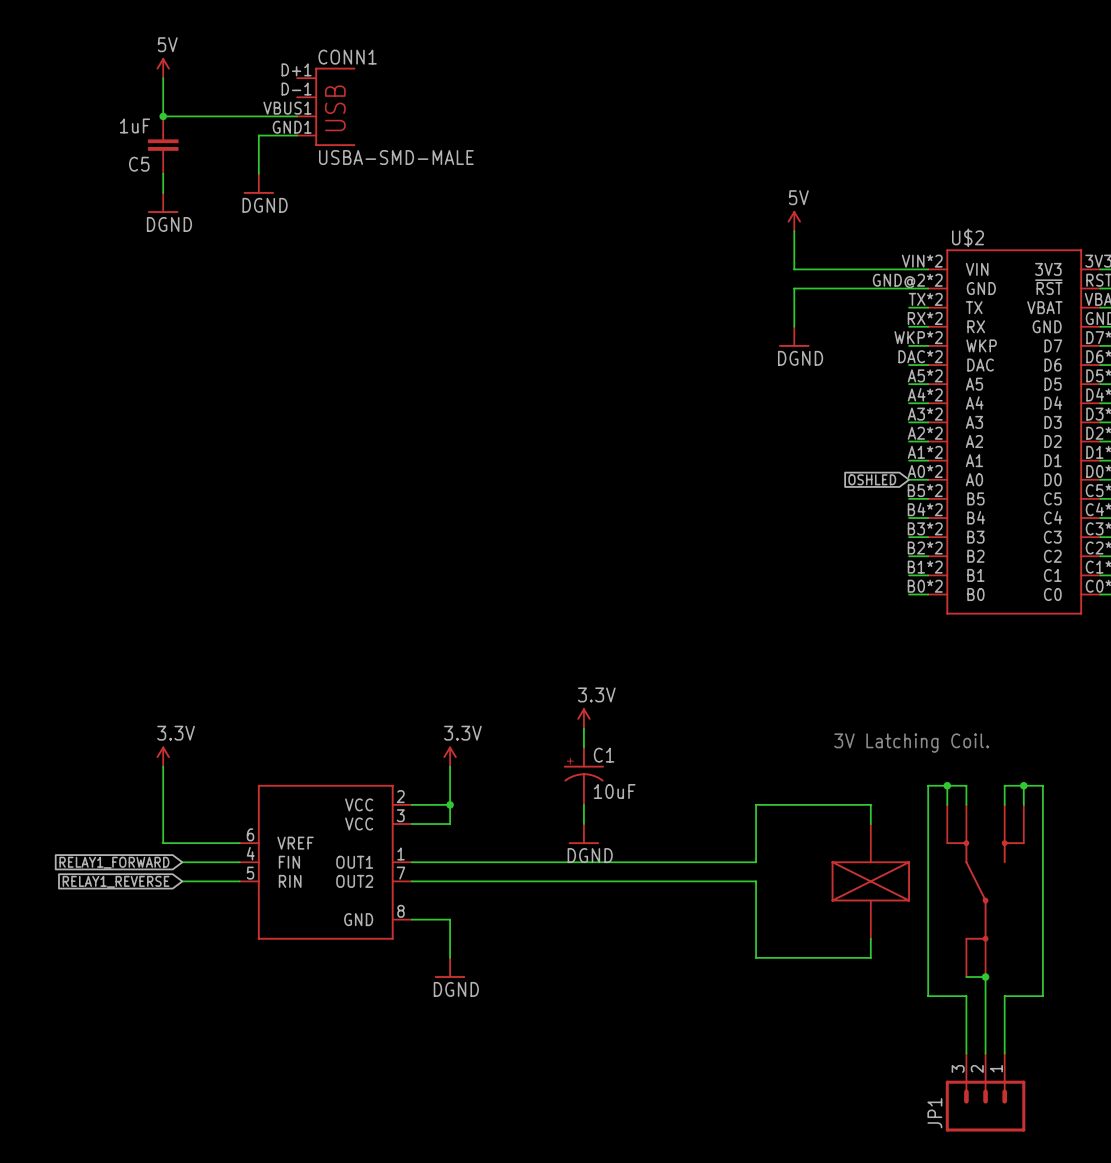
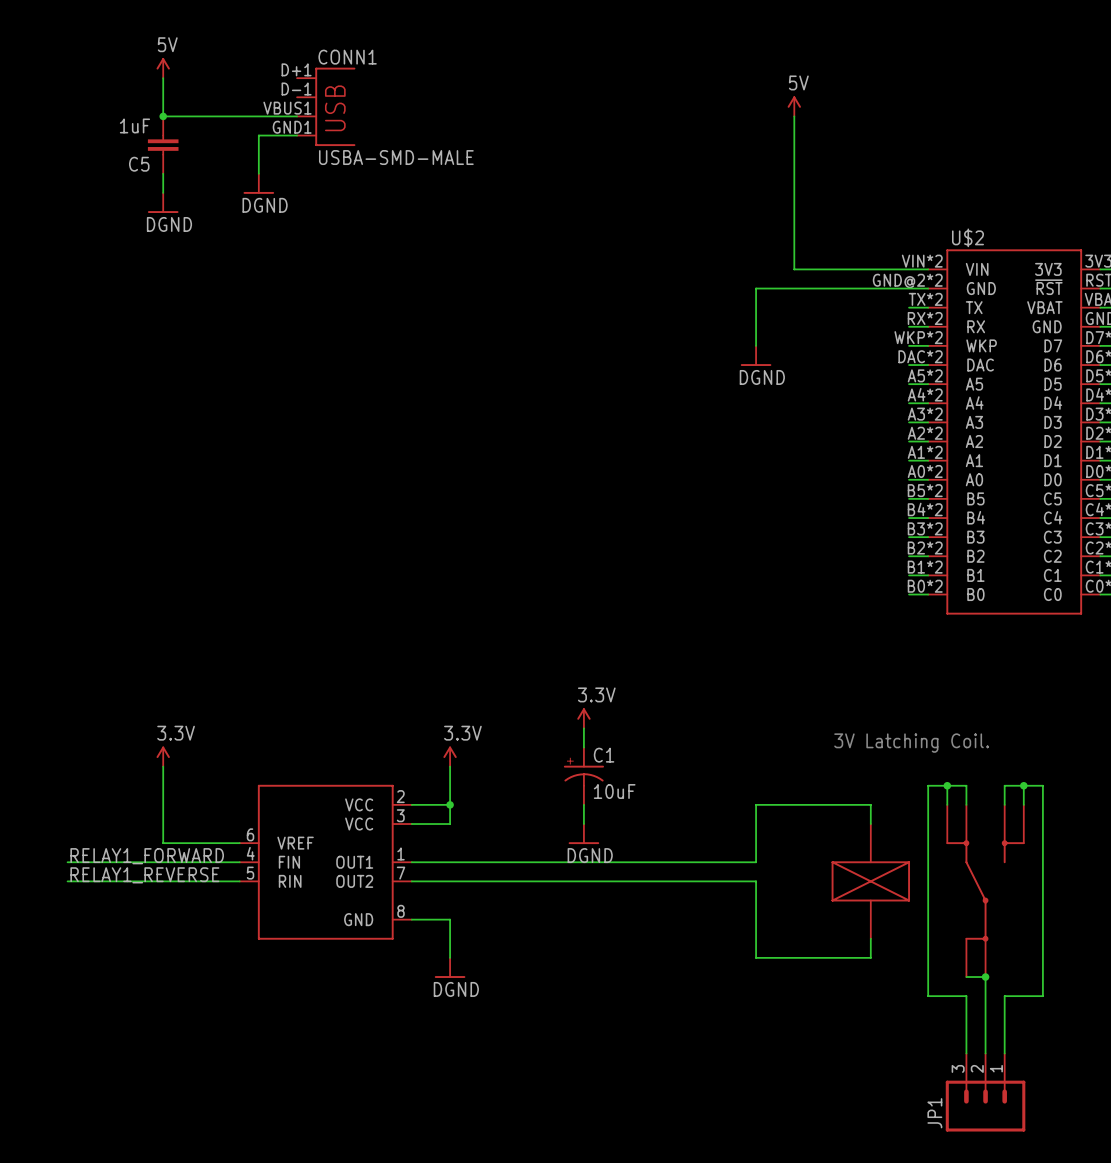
wire: none -> (794, 116) (794, 231)
power symbol position: 5V (794, 221) -> 5V (794, 106)
wire: (794, 288) (794, 326) -> (794, 288) (756, 288) (756, 345)
power symbol position: DGND (794, 336) -> DGND (756, 355)
global label: OSHLED (872, 479) -> none
label: none -> RELAY1_FORWARD (147, 856)
wire: none -> (67, 862) (182, 862)
global label: RELAY1_FORWARD (114, 862) -> none
label: none -> RELAY1_REVERSE (144, 875)
wire: none -> (67, 881) (182, 881)
global label: RELAY1_REVERSE (116, 881) -> none

